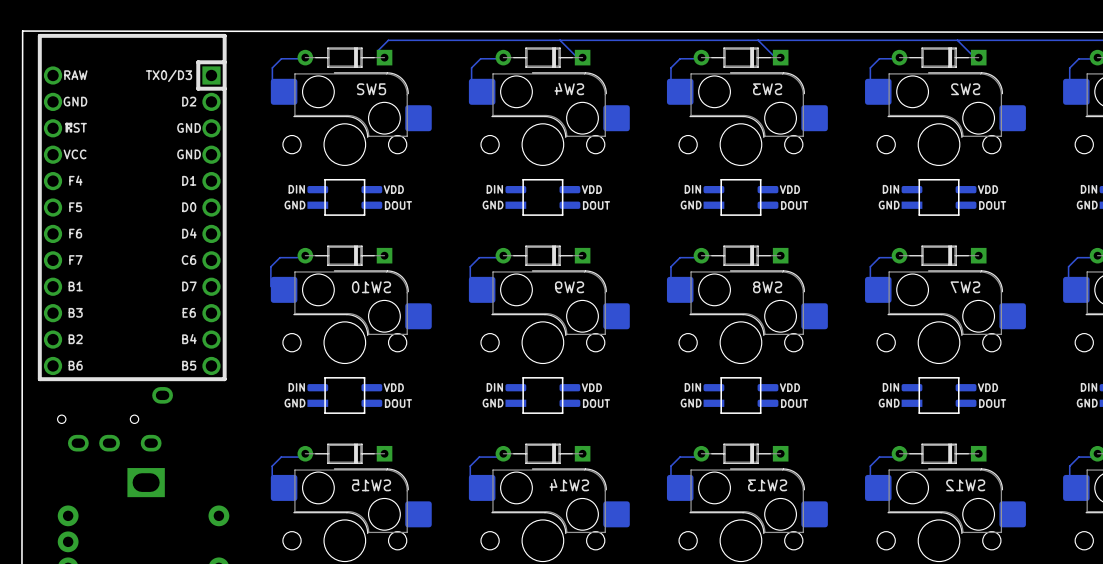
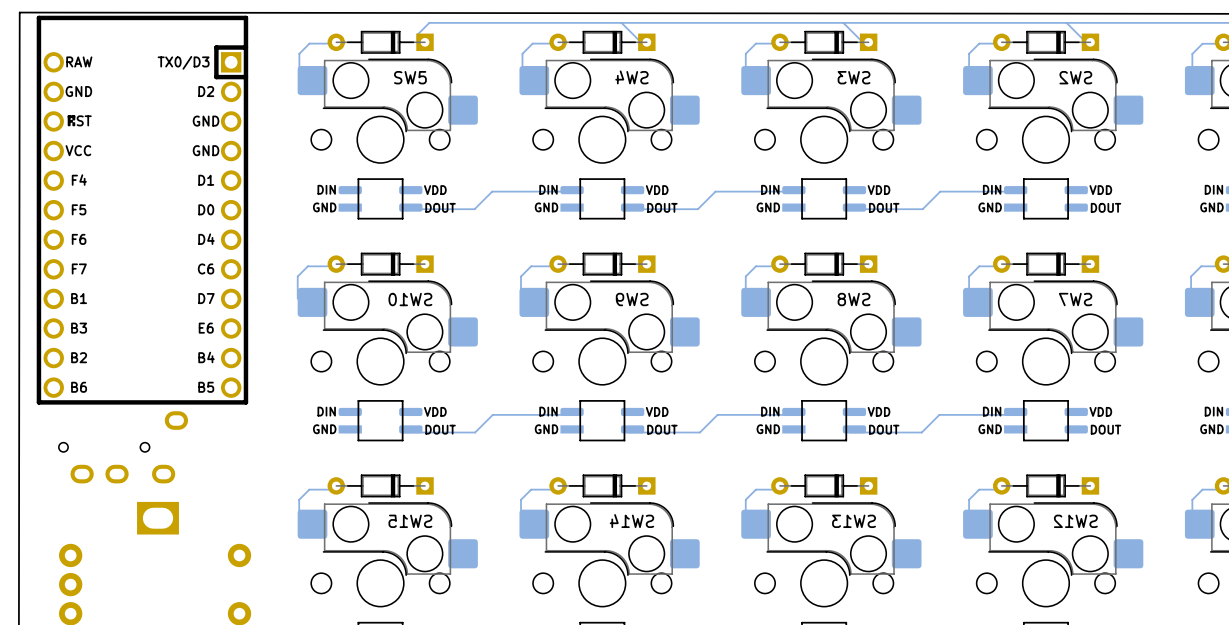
bottom track: none -> (565, 191) (492, 191) (474, 209) (402, 209)
bottom track: none -> (788, 191) (715, 191) (697, 209) (626, 209)
bottom track: none -> (1013, 191) (940, 191) (922, 209) (850, 209)
bottom track: none -> (565, 414) (492, 414) (475, 432) (403, 432)
bottom track: none -> (790, 414) (717, 414) (699, 432) (628, 432)
bottom track: none -> (1012, 414) (939, 414) (921, 432) (849, 432)

